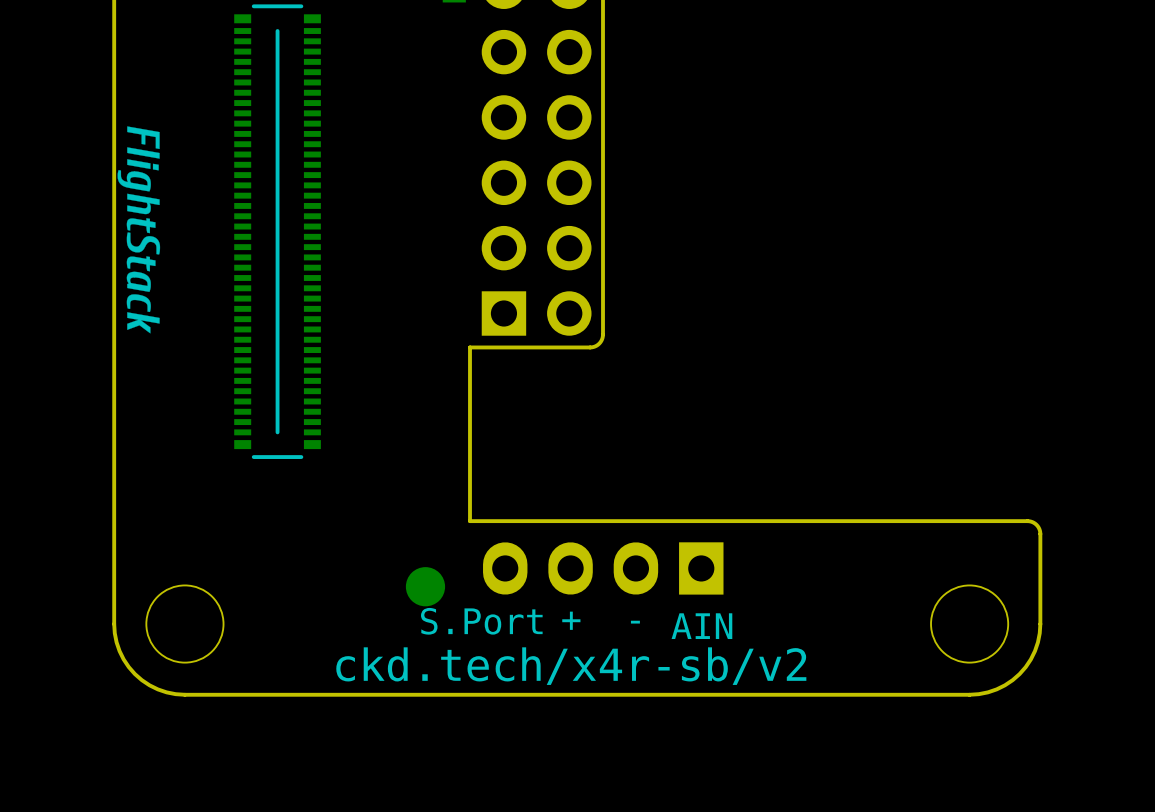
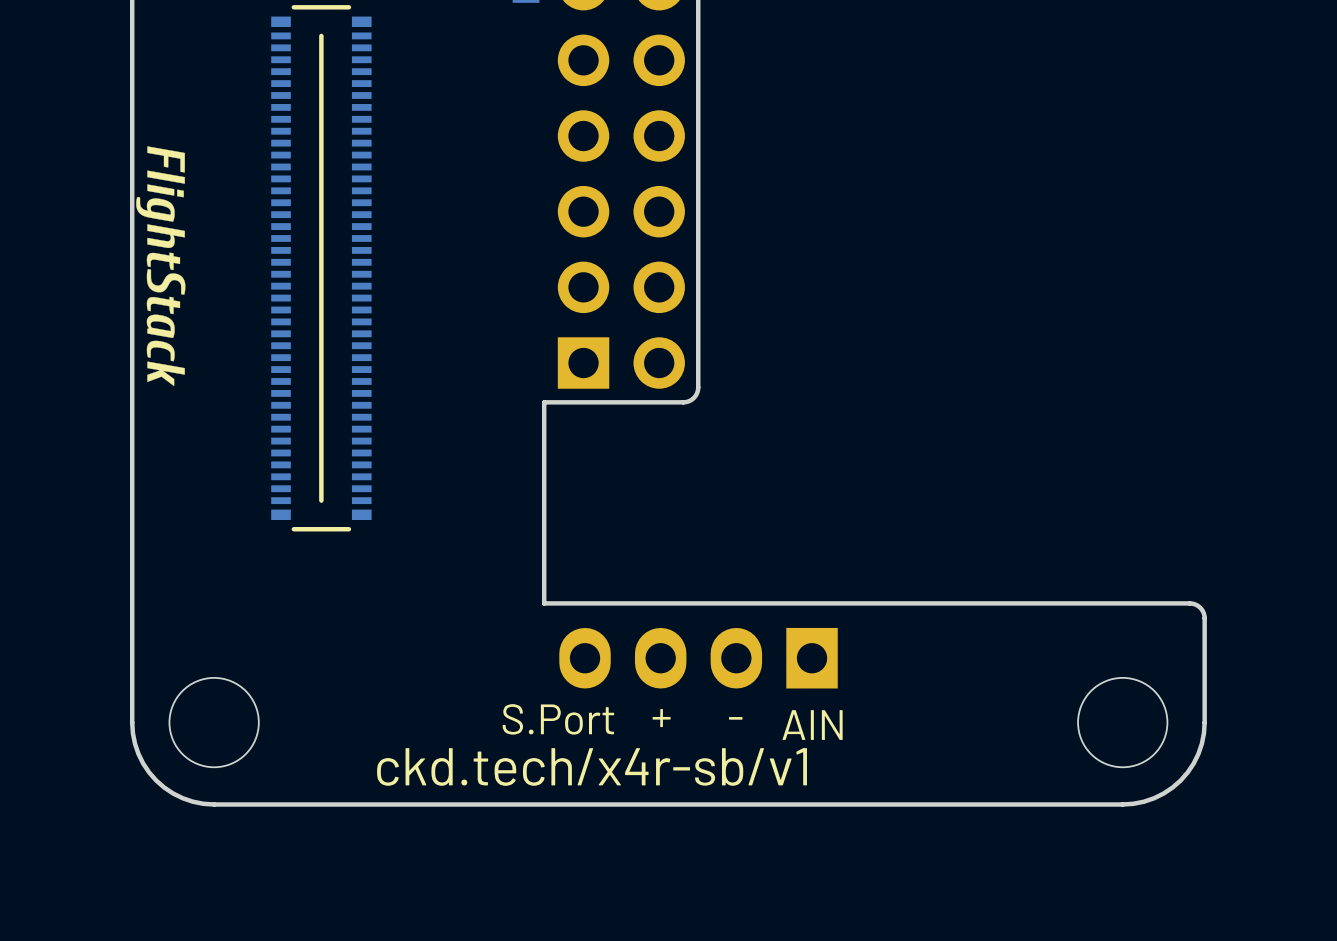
part: (425, 586) -> none
text: ckd.tech/x4r-sb/v2 (571, 666) -> ckd.tech/x4r-sb/v1 (592, 767)

